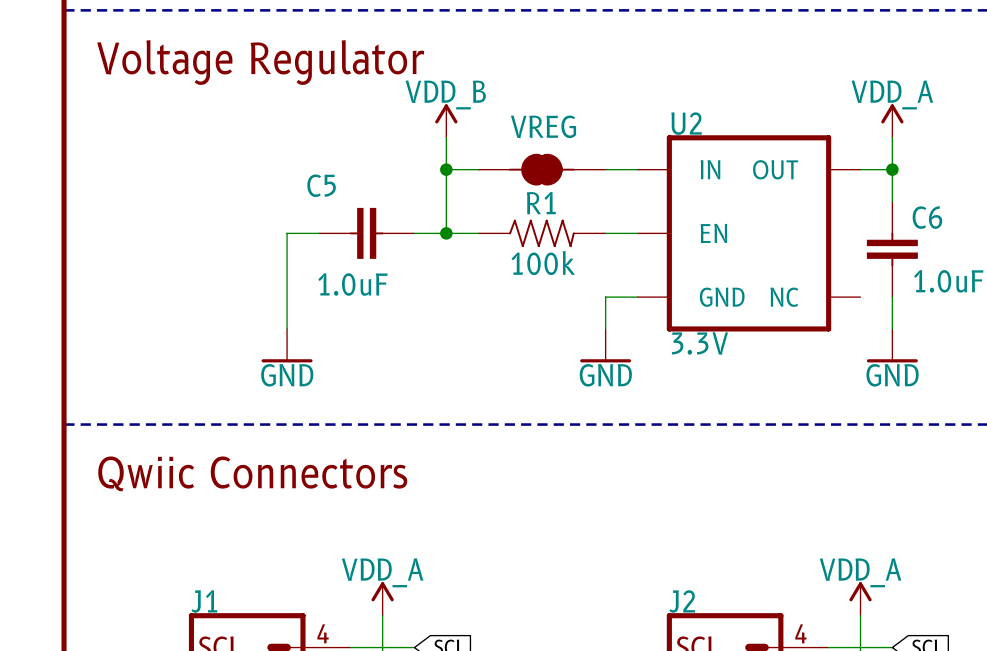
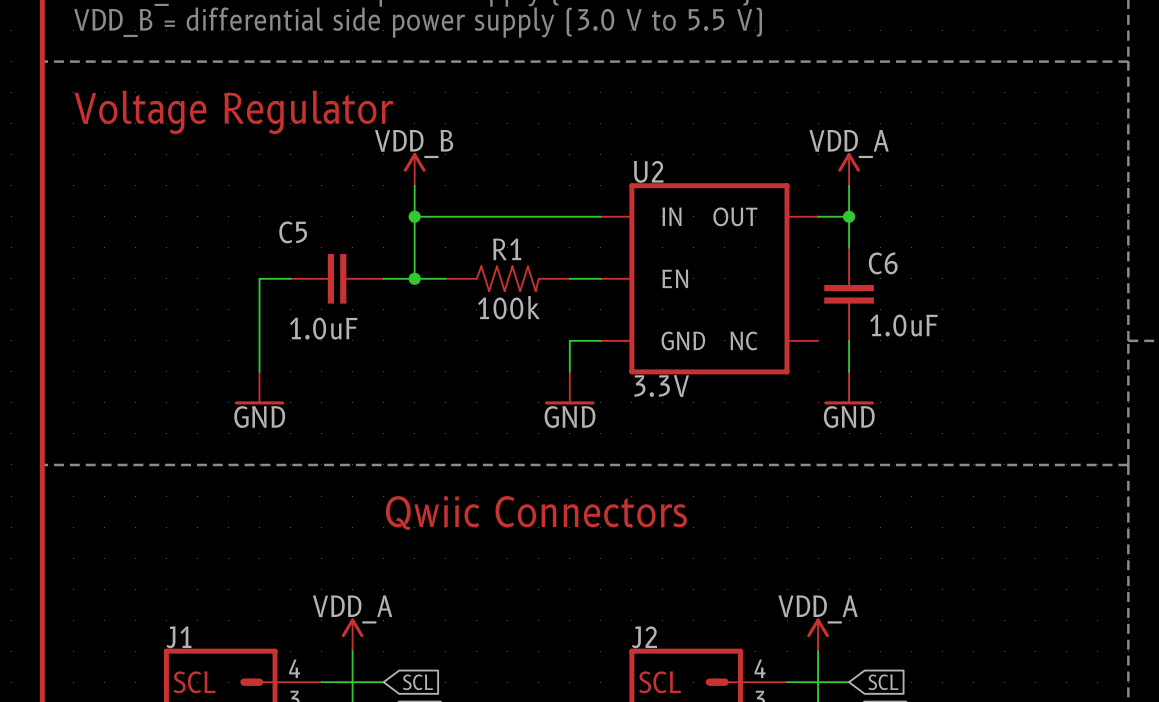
VREG: (541, 169) -> none
text: Qwiic Connectors (252, 473) -> none
text: none -> Qwiic Connectors (536, 513)

